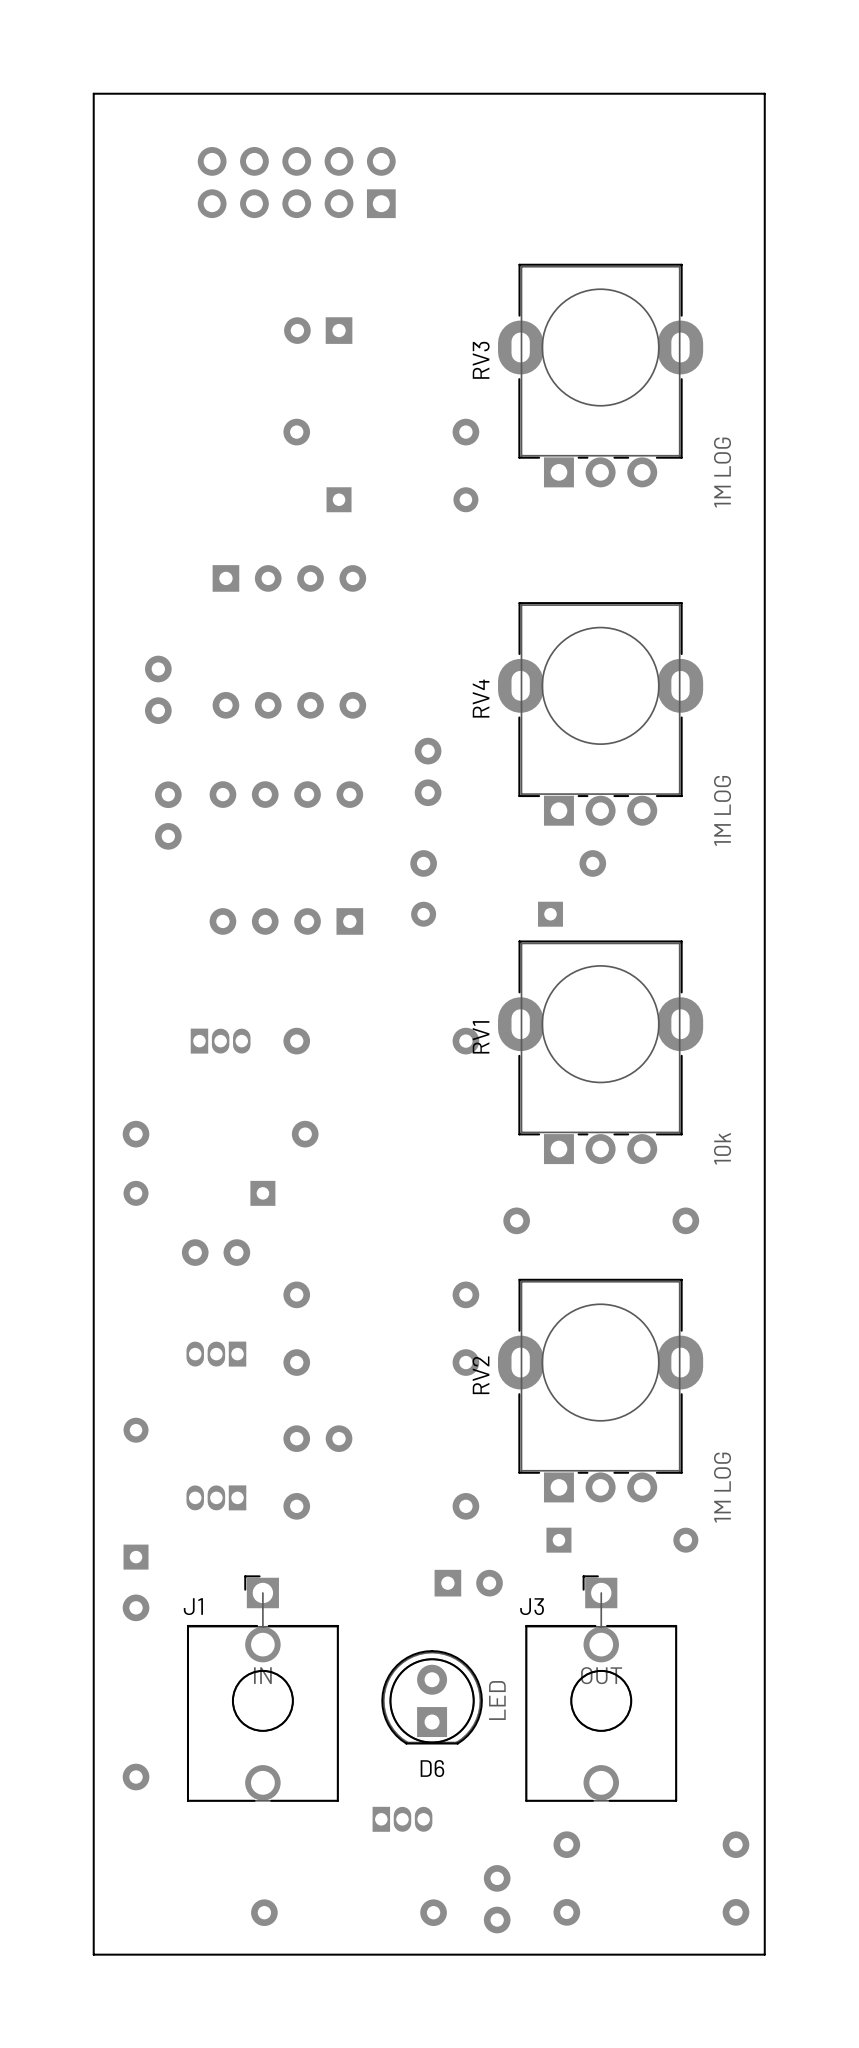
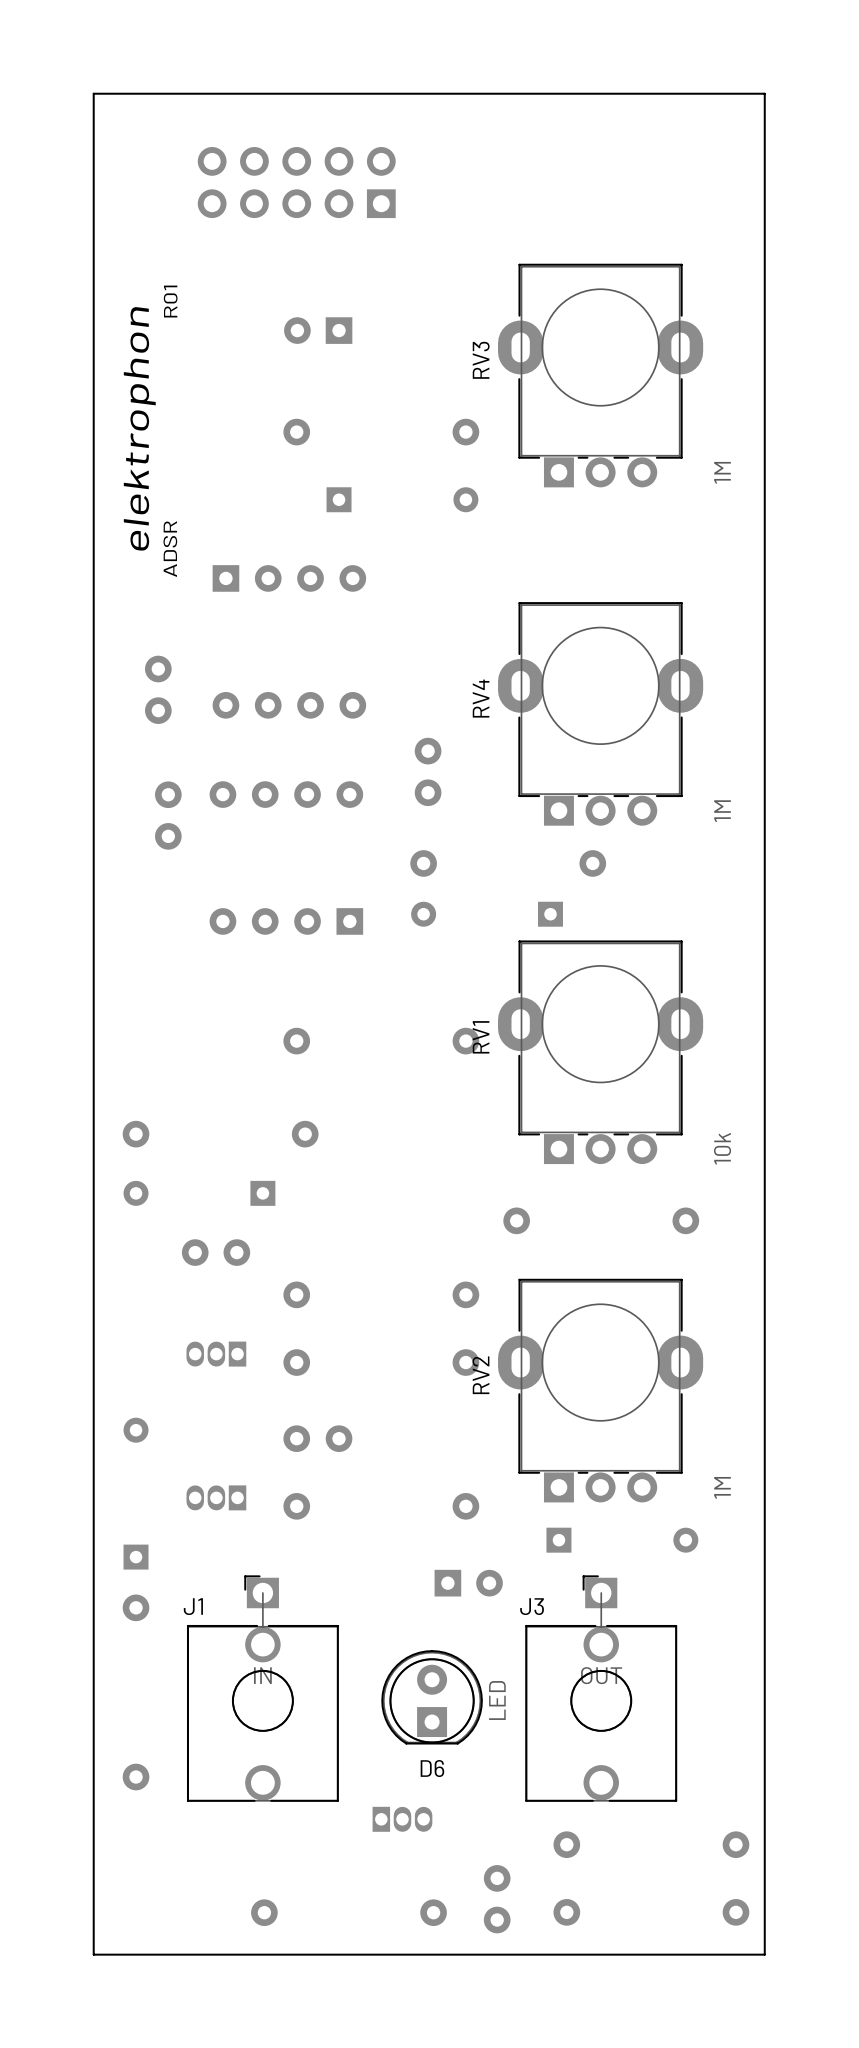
drawing: none -> [123, 285, 178, 577]
RV3 value: 1M LOG (722, 472) -> 1M (722, 472)
RV4 value: 1M LOG (722, 810) -> 1M (722, 811)
part: (220, 1041) -> none
RV2 value: 1M LOG (722, 1487) -> 1M (722, 1487)

